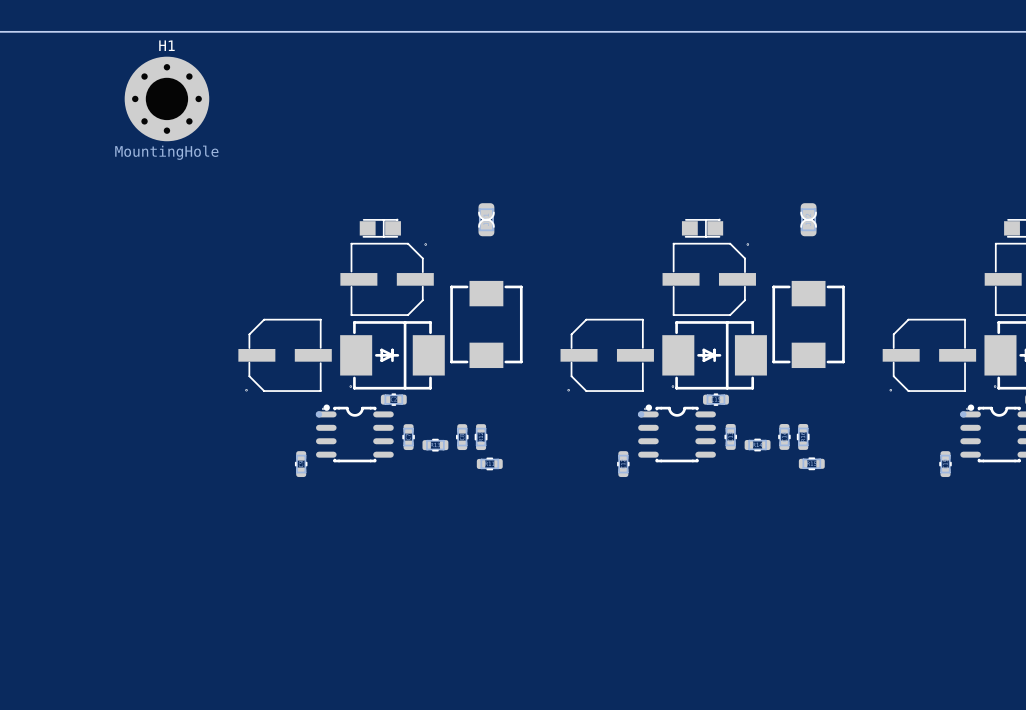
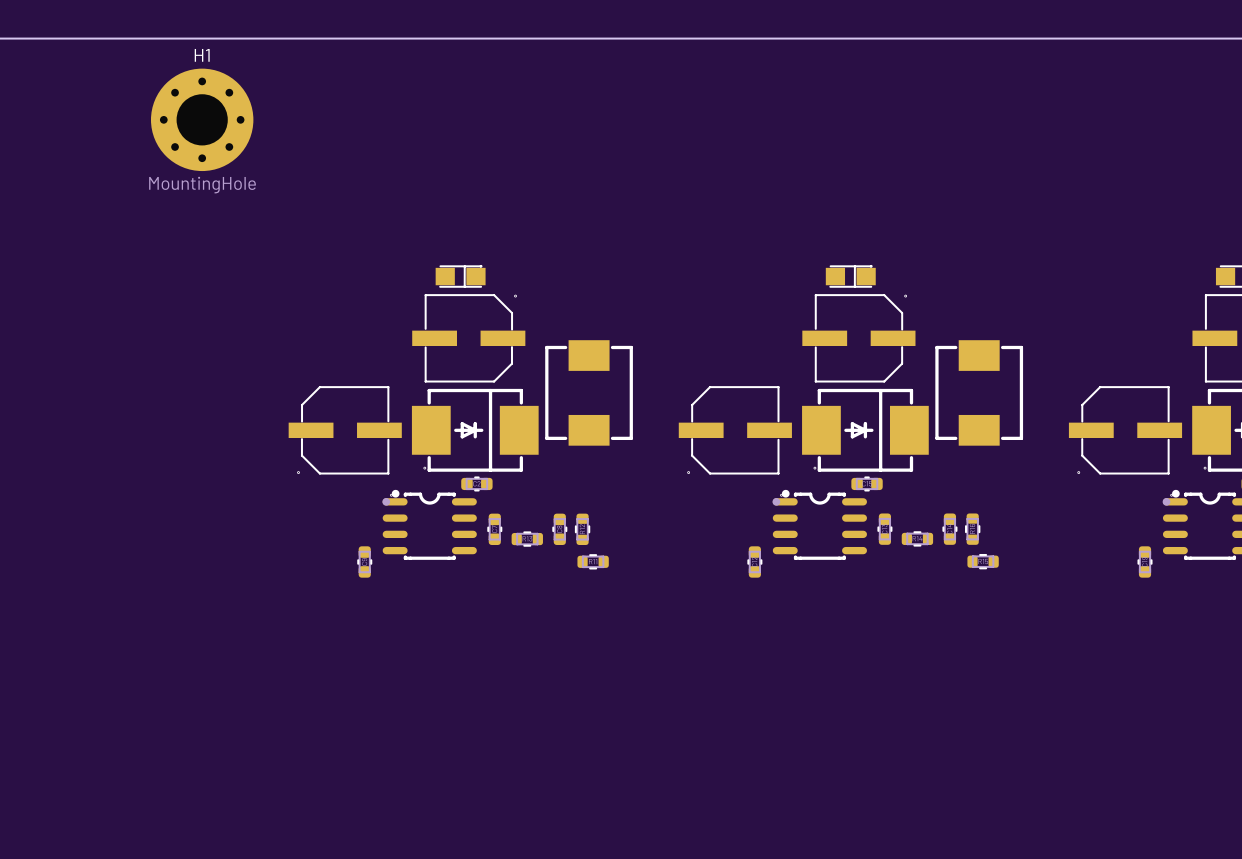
part: (486, 219) -> none
part: (808, 219) -> none

